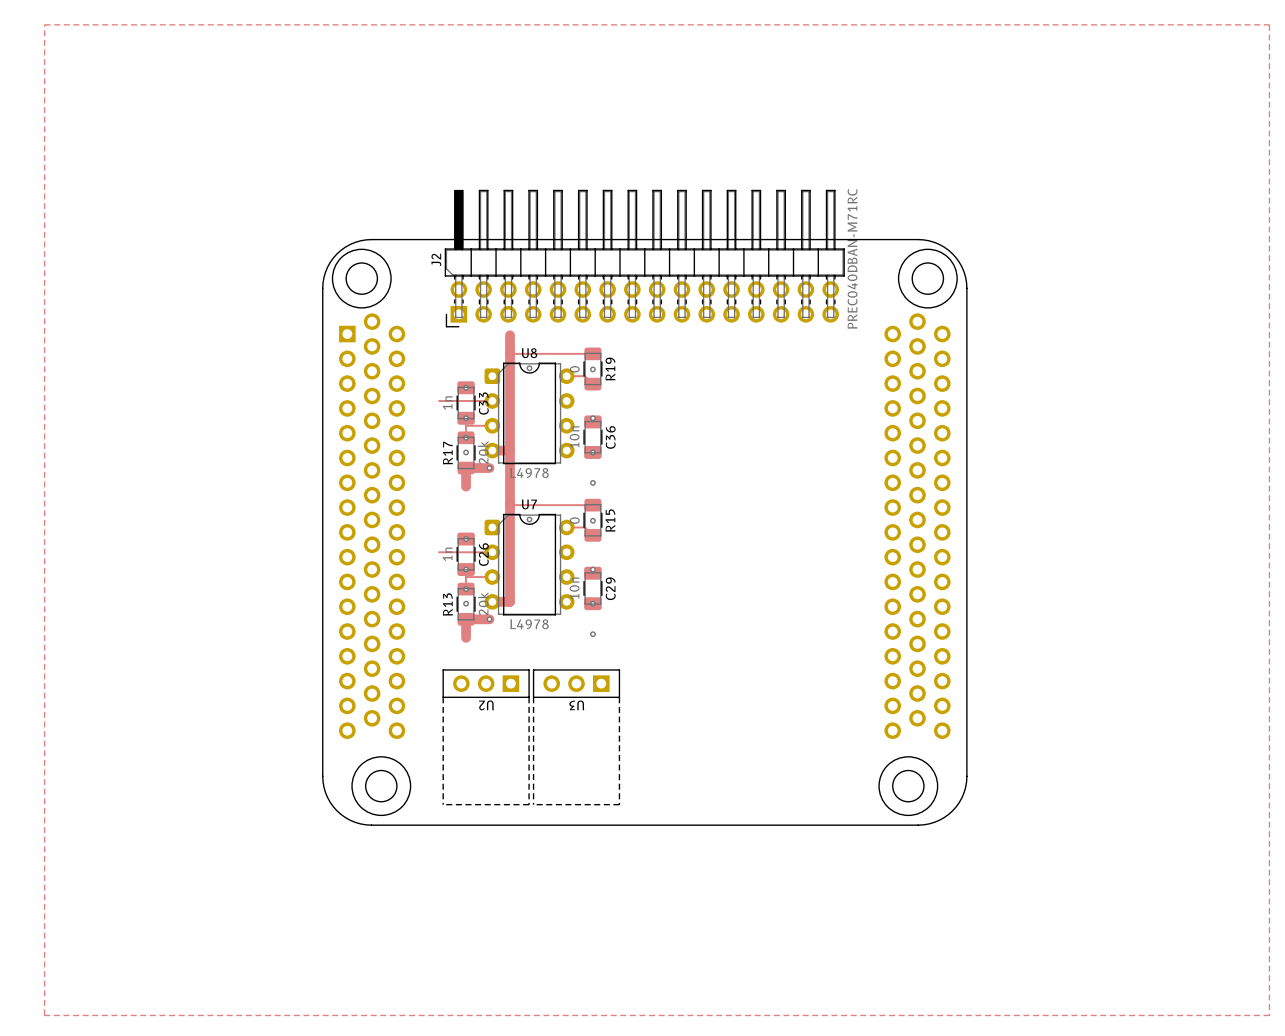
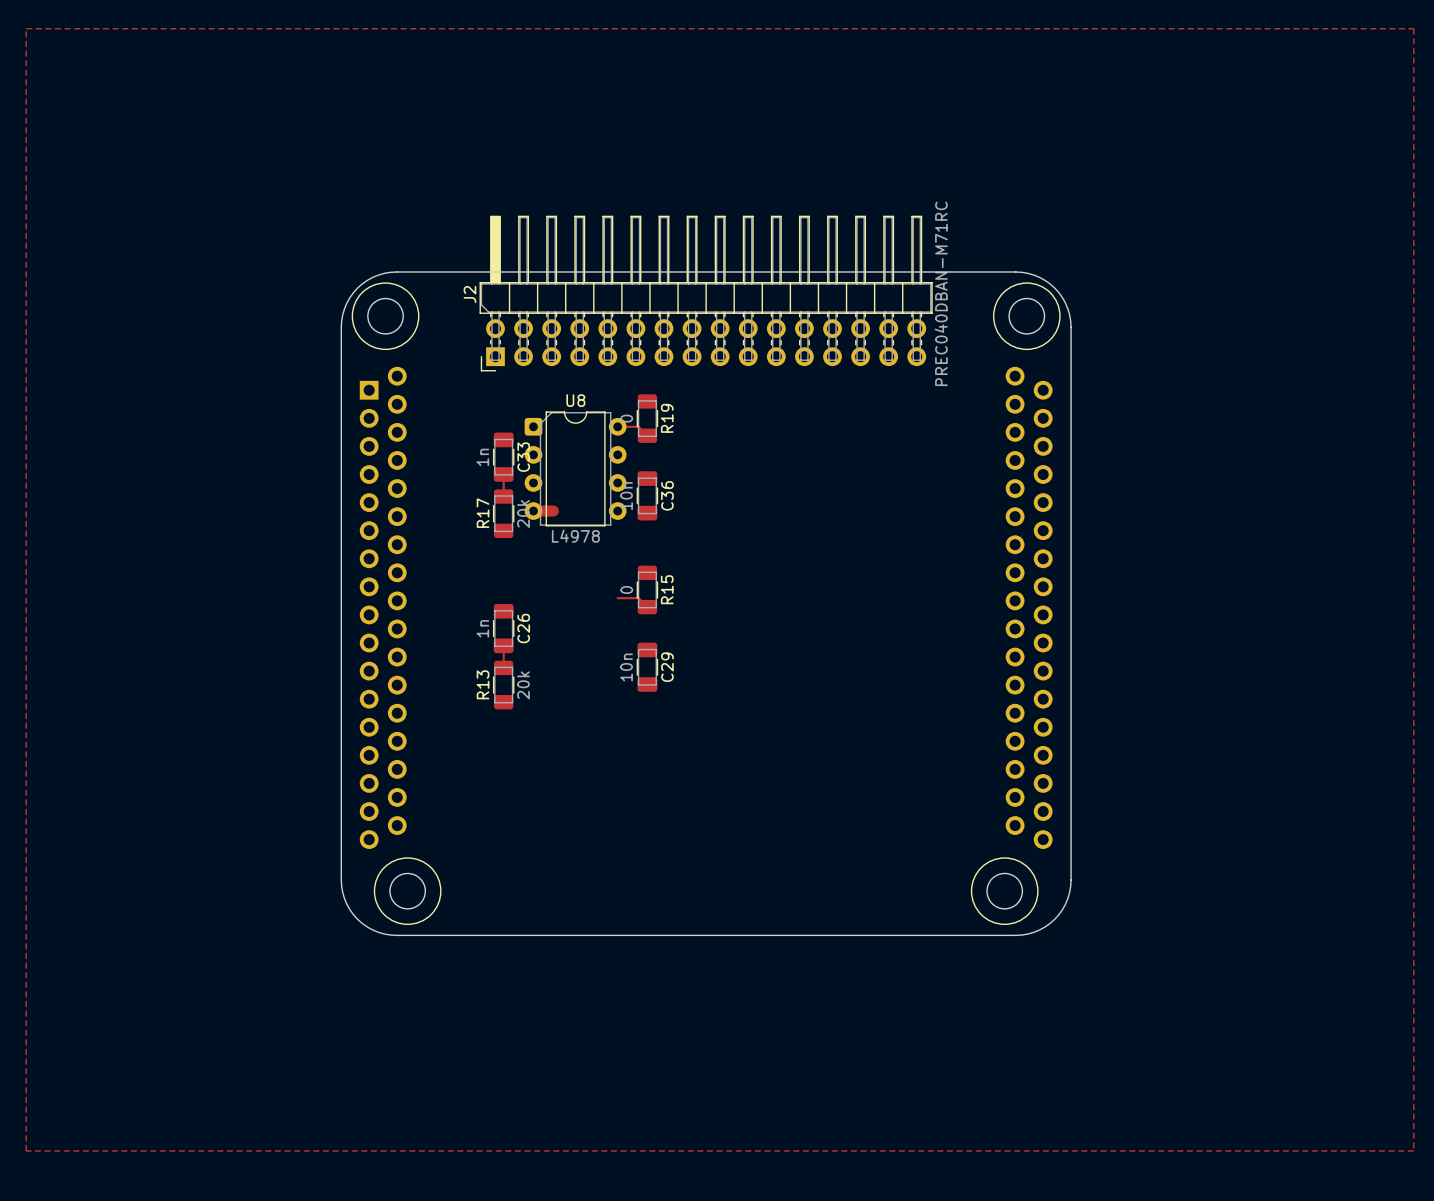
part footprint: [322, 239, 968, 826] -> [341, 271, 1072, 936]
track: (509, 335) (509, 601) (492, 601) -> none
track: (509, 353) (592, 353) -> none
via: (529, 368) -> none
via: (592, 369) -> none
via: (466, 387) -> none
track: (439, 401) (492, 401) -> none
via: (466, 418) -> none
via: (592, 418) -> none
track: (466, 425) (492, 425) -> none
via: (466, 437) -> none
via: (466, 452) -> none
via: (592, 452) -> none
track: (489, 468) (466, 468) (466, 486) -> none
via: (489, 468) -> none
via: (592, 482) -> none
track: (509, 505) (592, 505) -> none
via: (529, 519) -> none
via: (592, 520) -> none
via: (466, 539) -> none
track: (439, 552) (492, 552) -> none
U7: L4978 (529, 564) -> none
via: (466, 569) -> none
via: (592, 569) -> none
track: (466, 577) (492, 577) -> none
via: (466, 589) -> none
via: (466, 603) -> none
via: (592, 603) -> none
track: (489, 619) (466, 619) (466, 637) -> none
via: (489, 619) -> none
via: (592, 634) -> none
U2: (486, 737) -> none
U3: (576, 737) -> none

